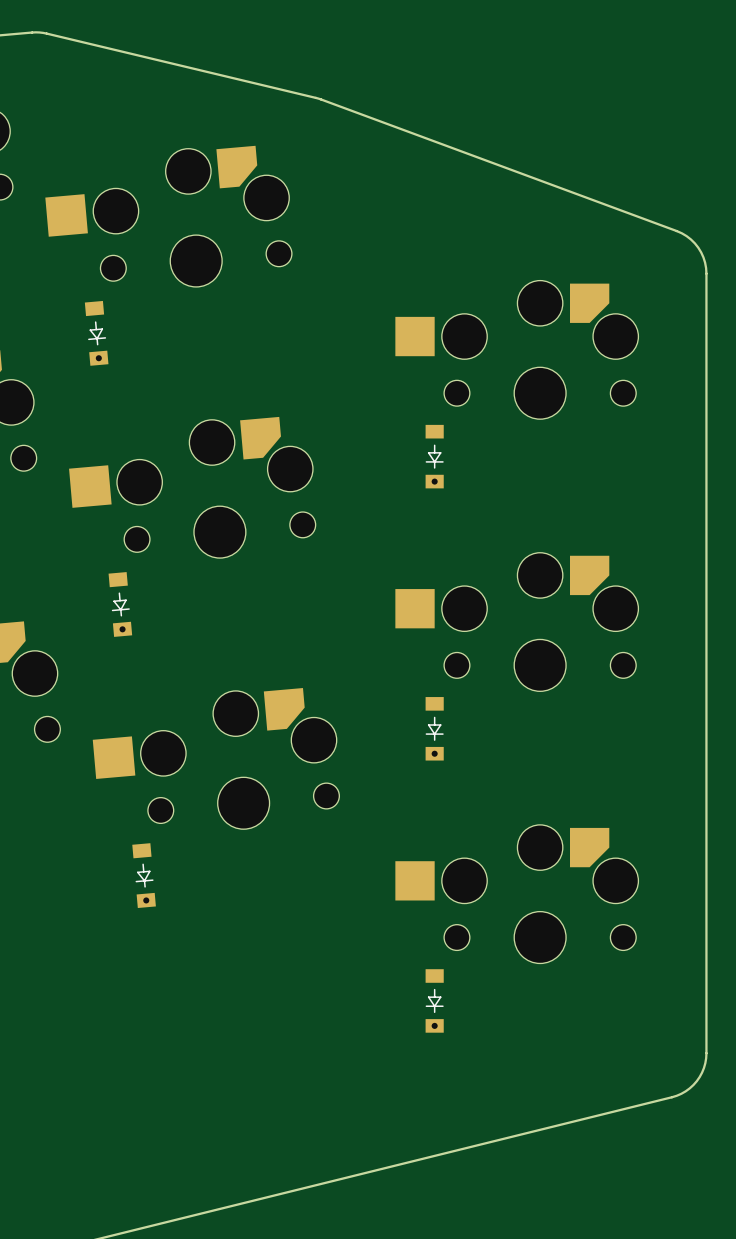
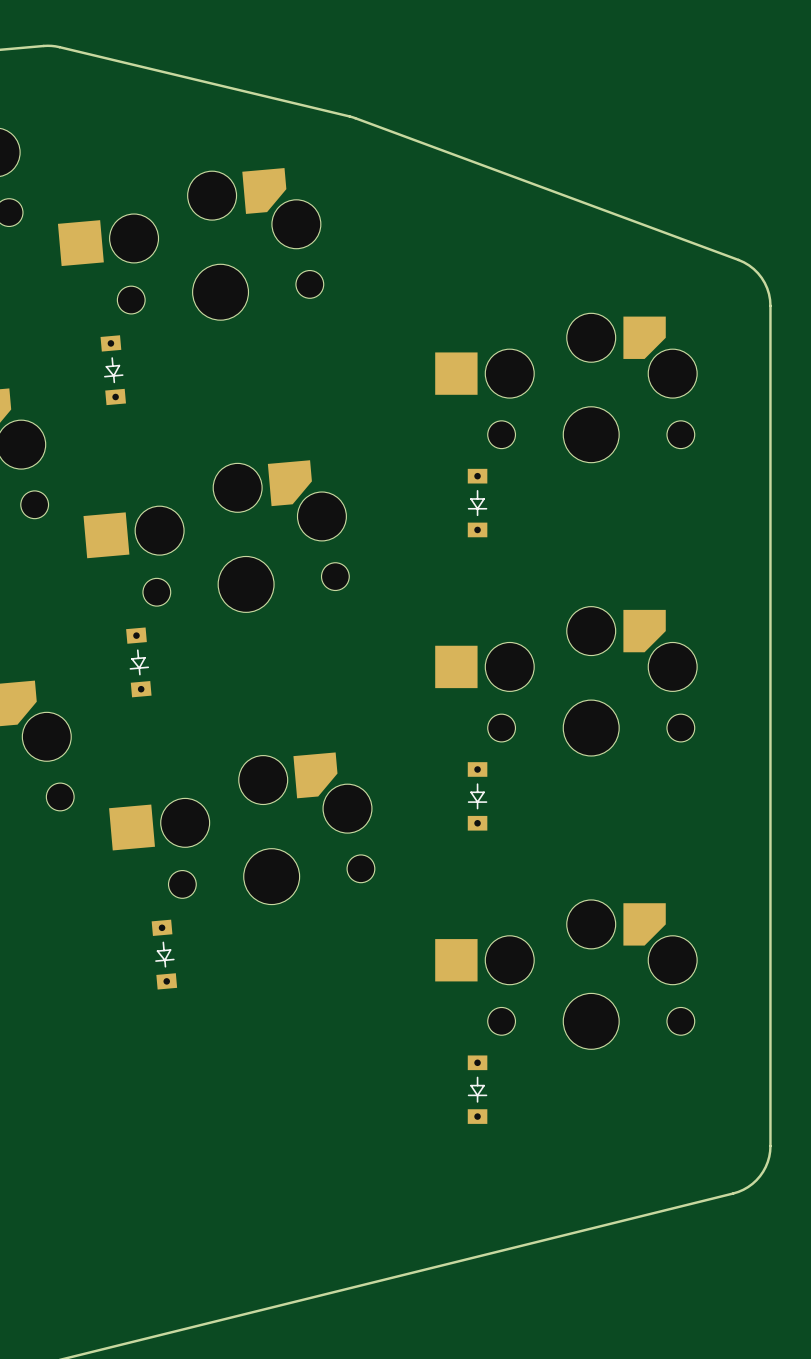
part footprint: [84, 300, 109, 366] -> [100, 335, 126, 406]
part footprint: [425, 424, 444, 489] -> [467, 468, 488, 538]
part footprint: [108, 572, 133, 637] -> [126, 627, 152, 698]
part footprint: [425, 697, 444, 761] -> [467, 762, 488, 831]
part footprint: [132, 843, 156, 909] -> [151, 919, 178, 990]
part footprint: [425, 969, 444, 1033] -> [467, 1055, 488, 1124]

